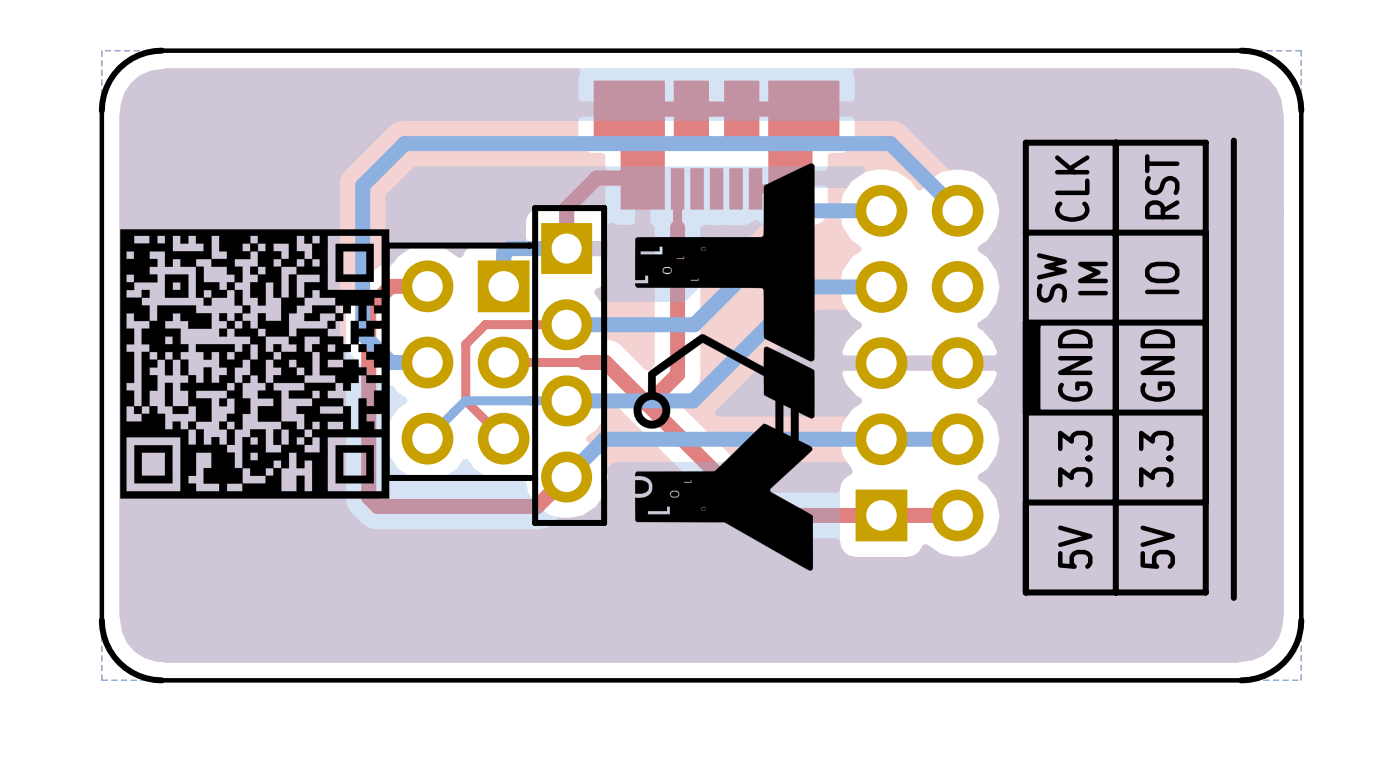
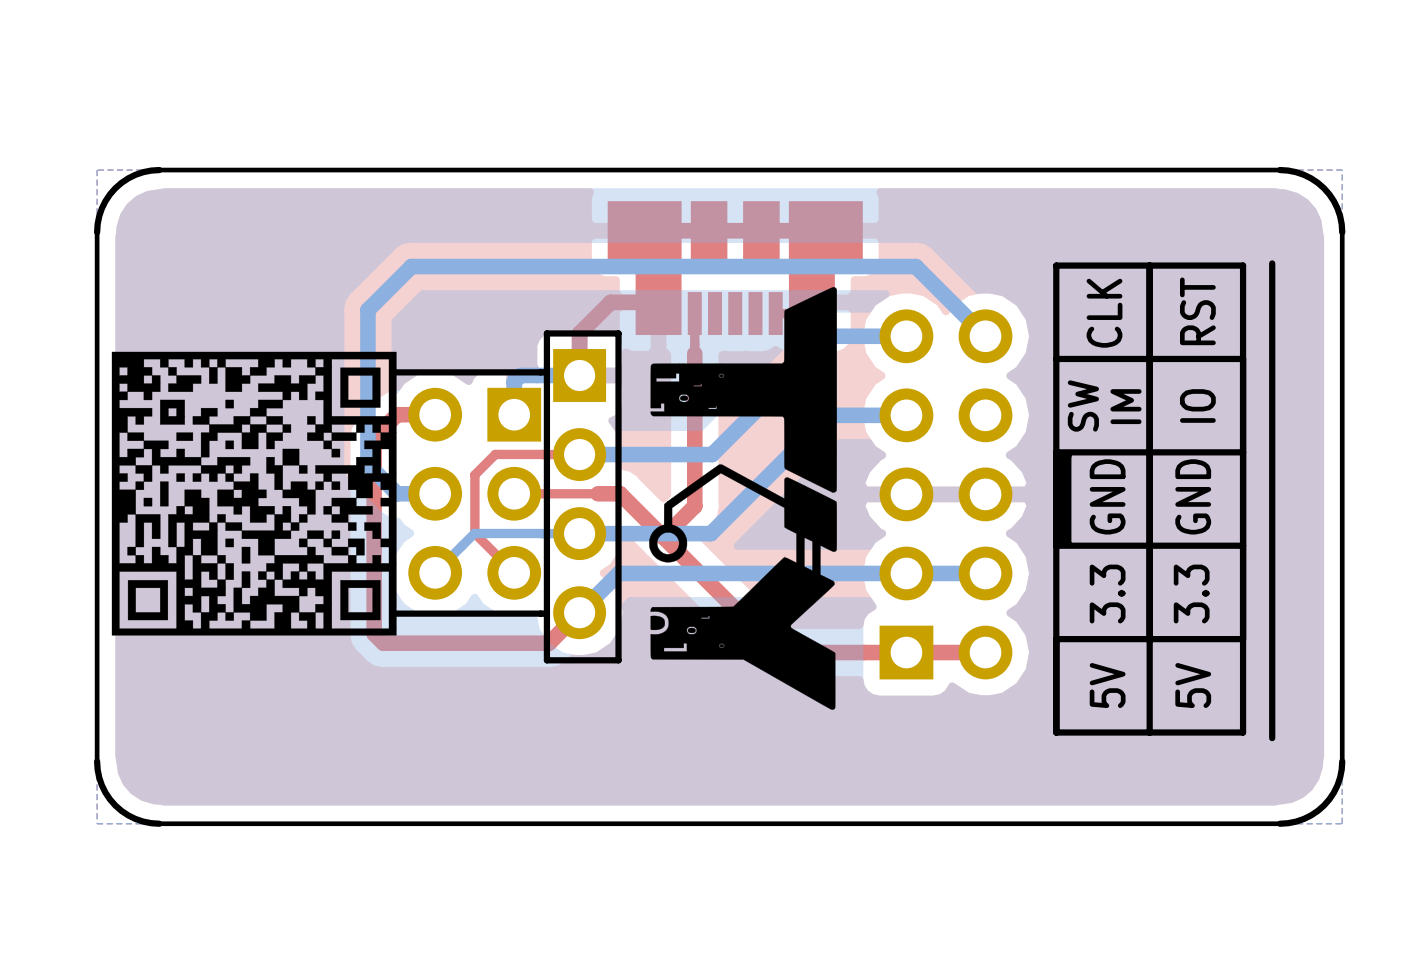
drawing shape: [120, 229, 390, 499] -> [111, 351, 397, 636]

